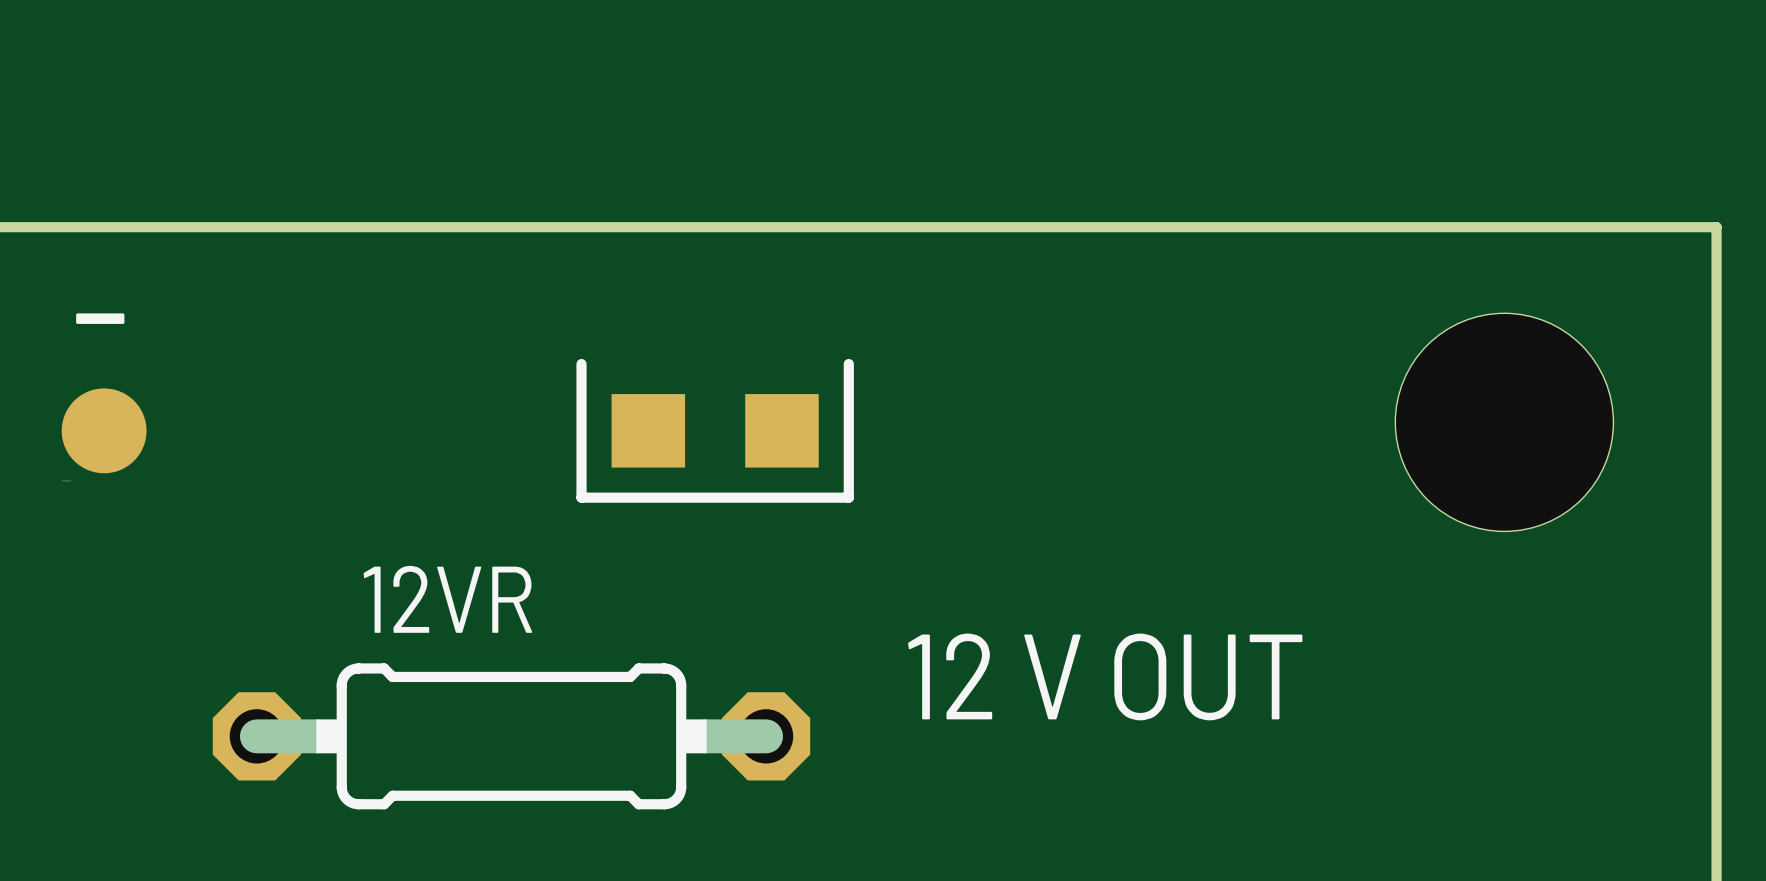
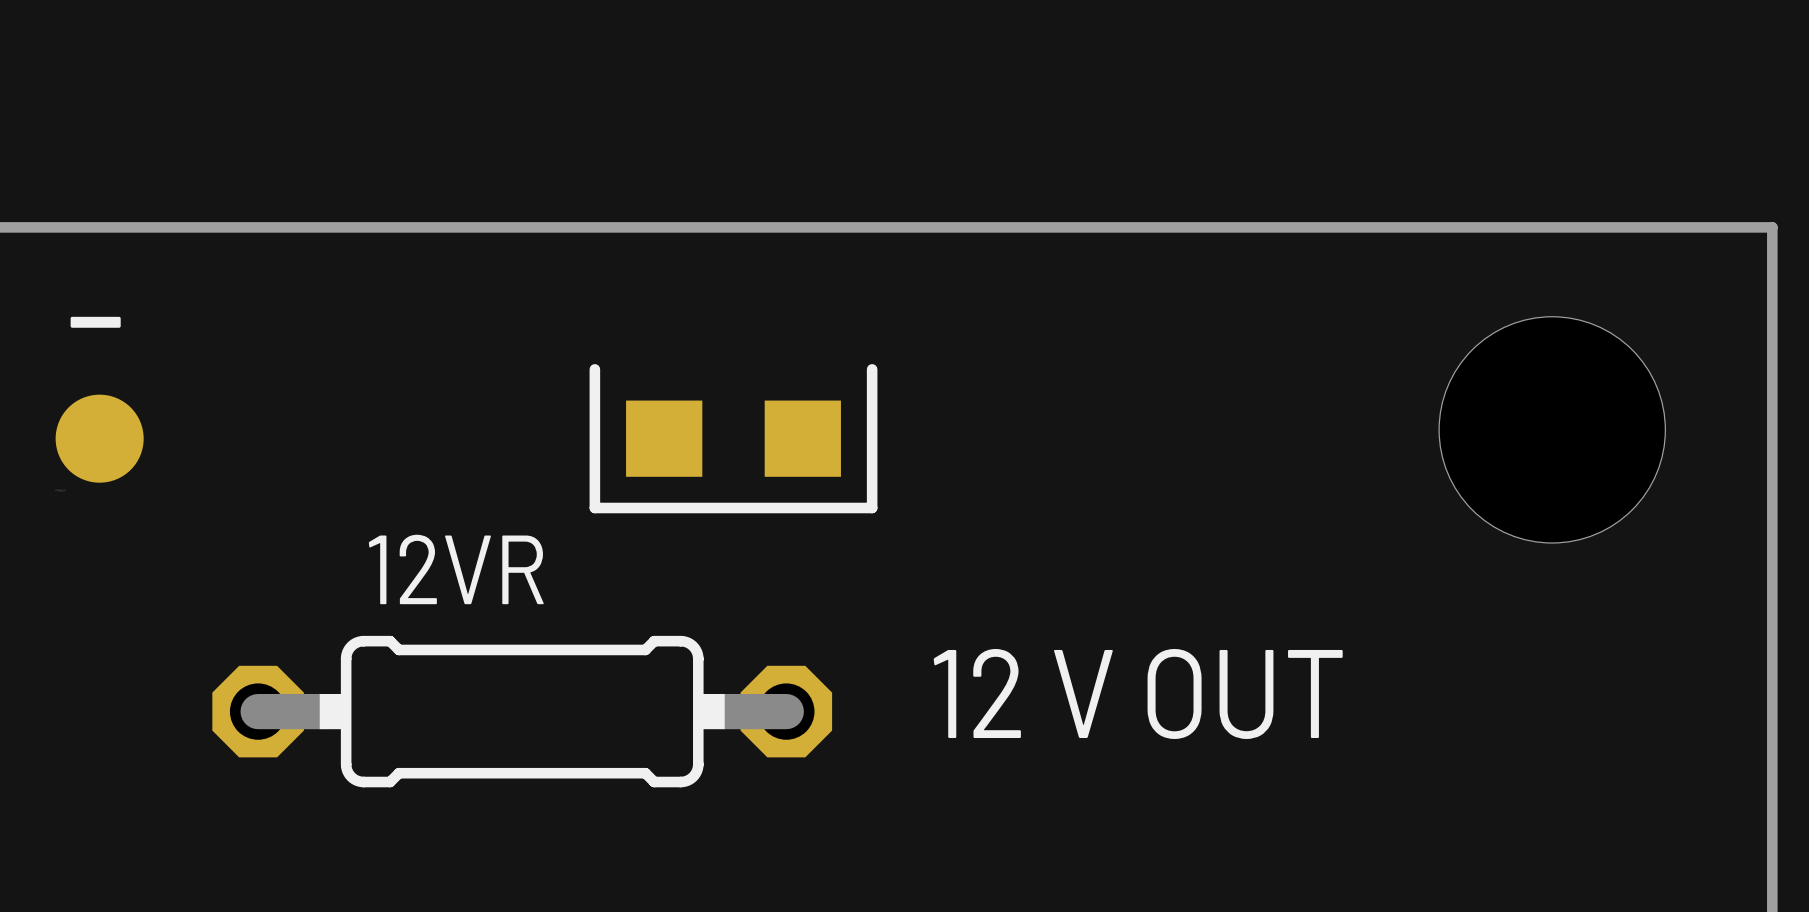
12VR position: (511, 736) -> (522, 711)

